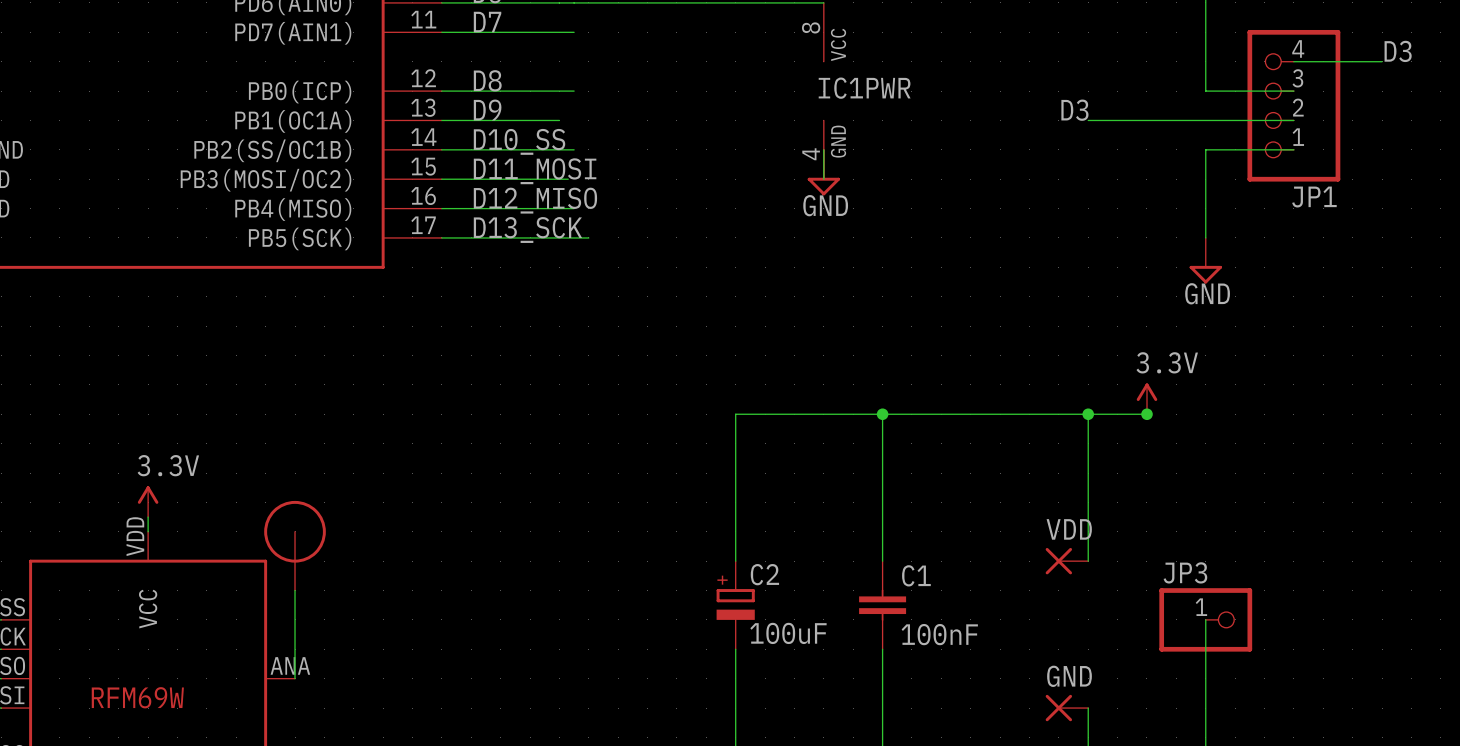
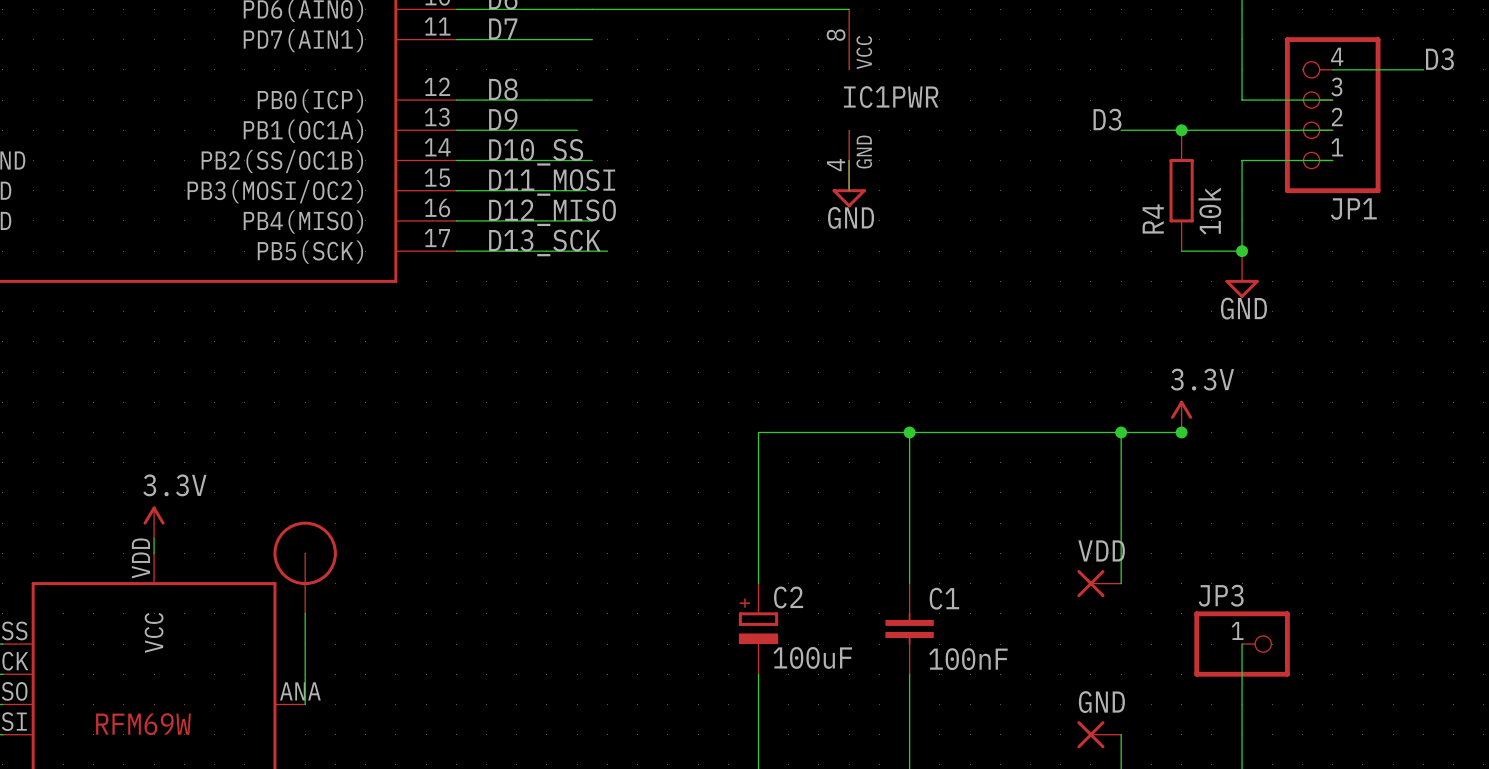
junction: none -> (1181, 130)
R4: none -> 10k (1181, 190)
wire: none -> (1181, 251) (1242, 251)
junction: none -> (1242, 251)

